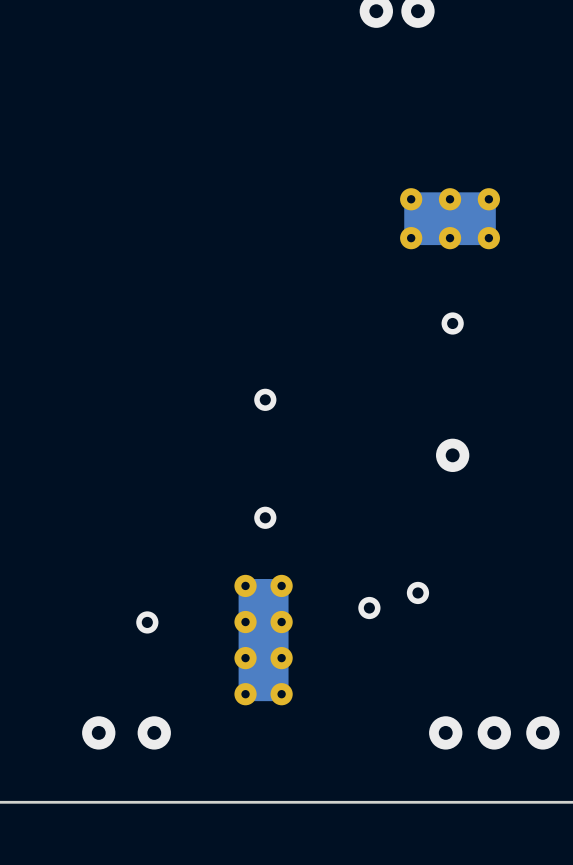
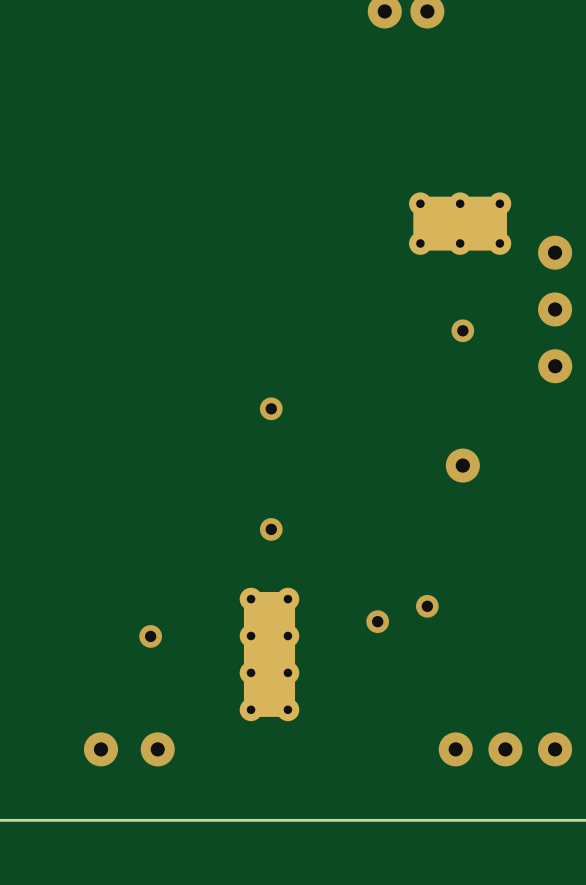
via: none -> (555, 252)
via: none -> (555, 309)
via: none -> (555, 366)

